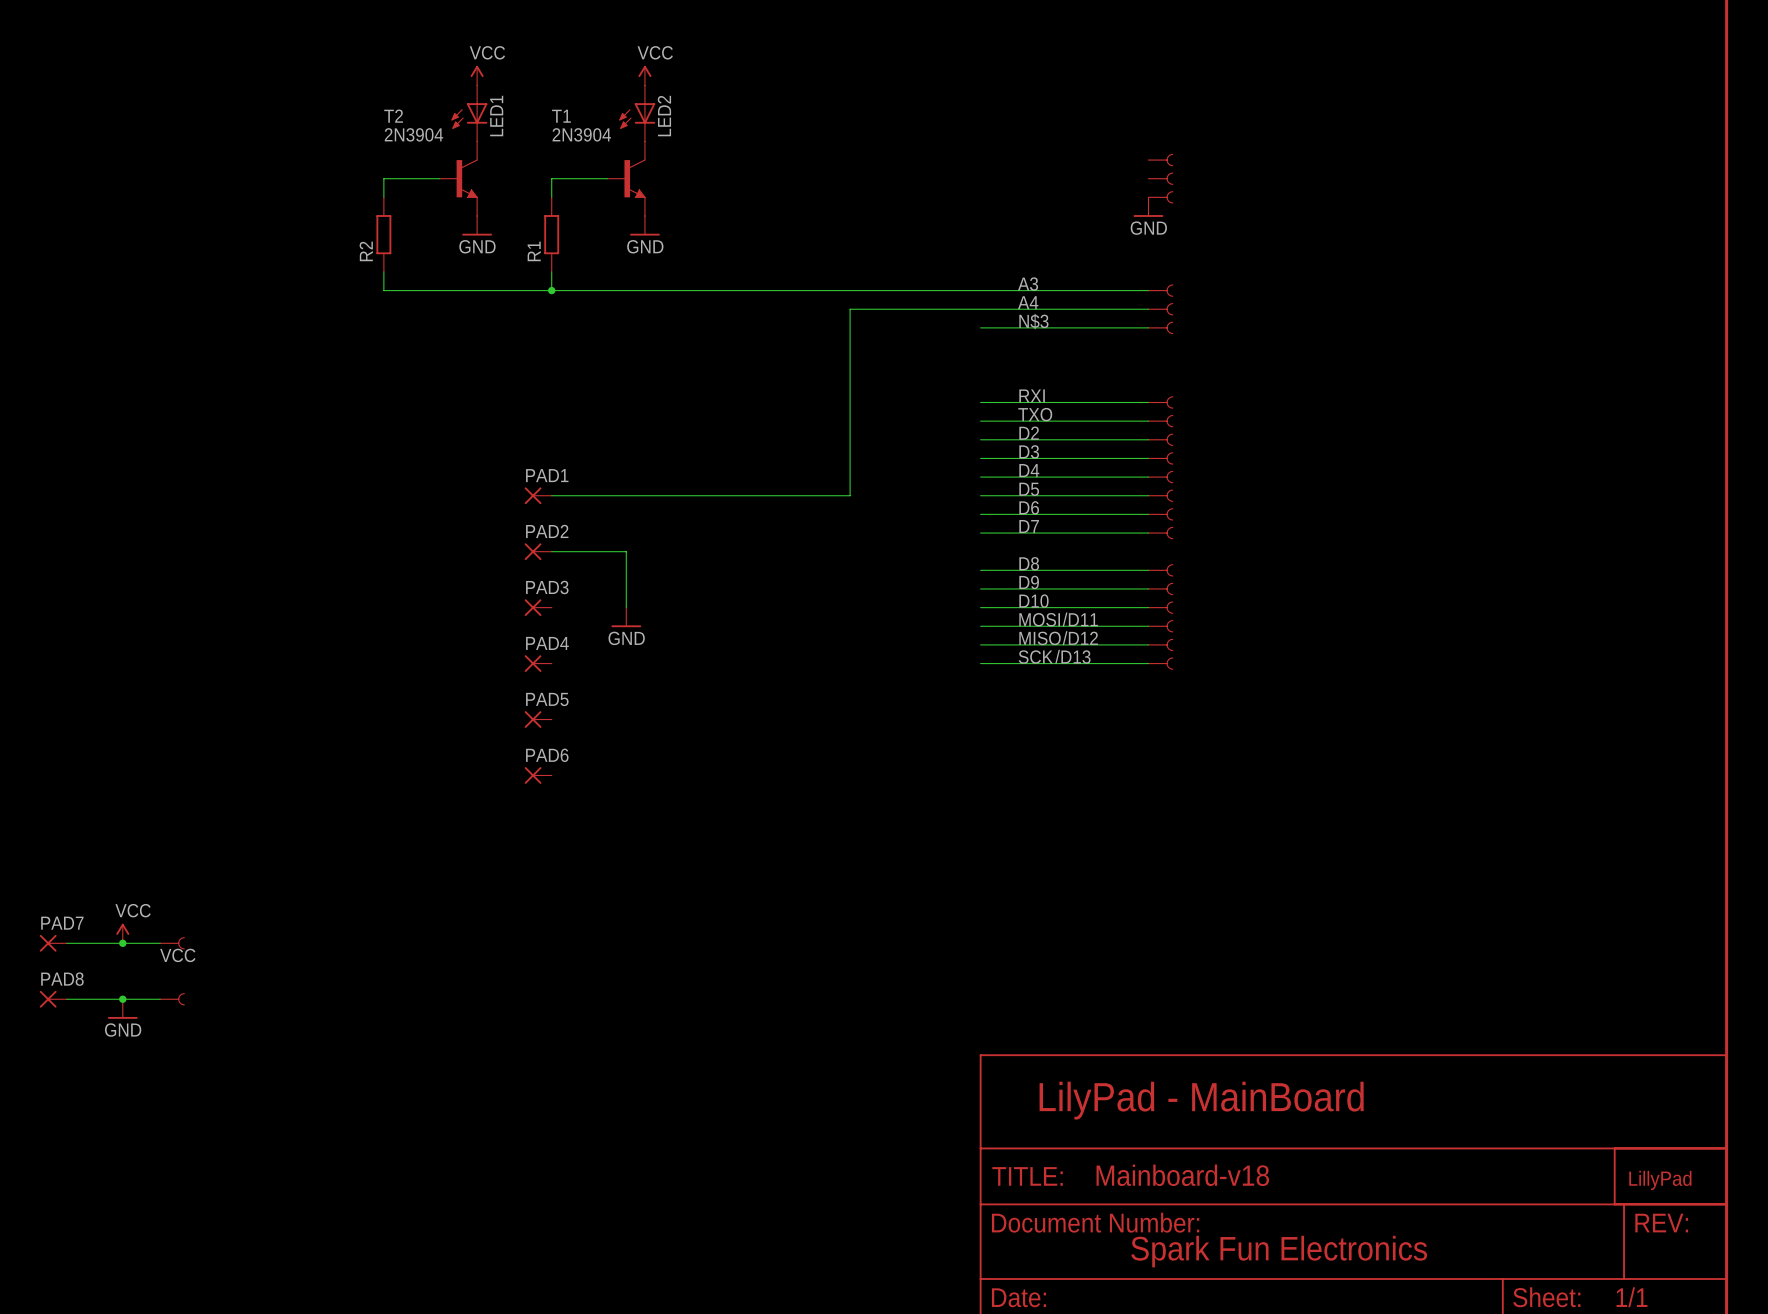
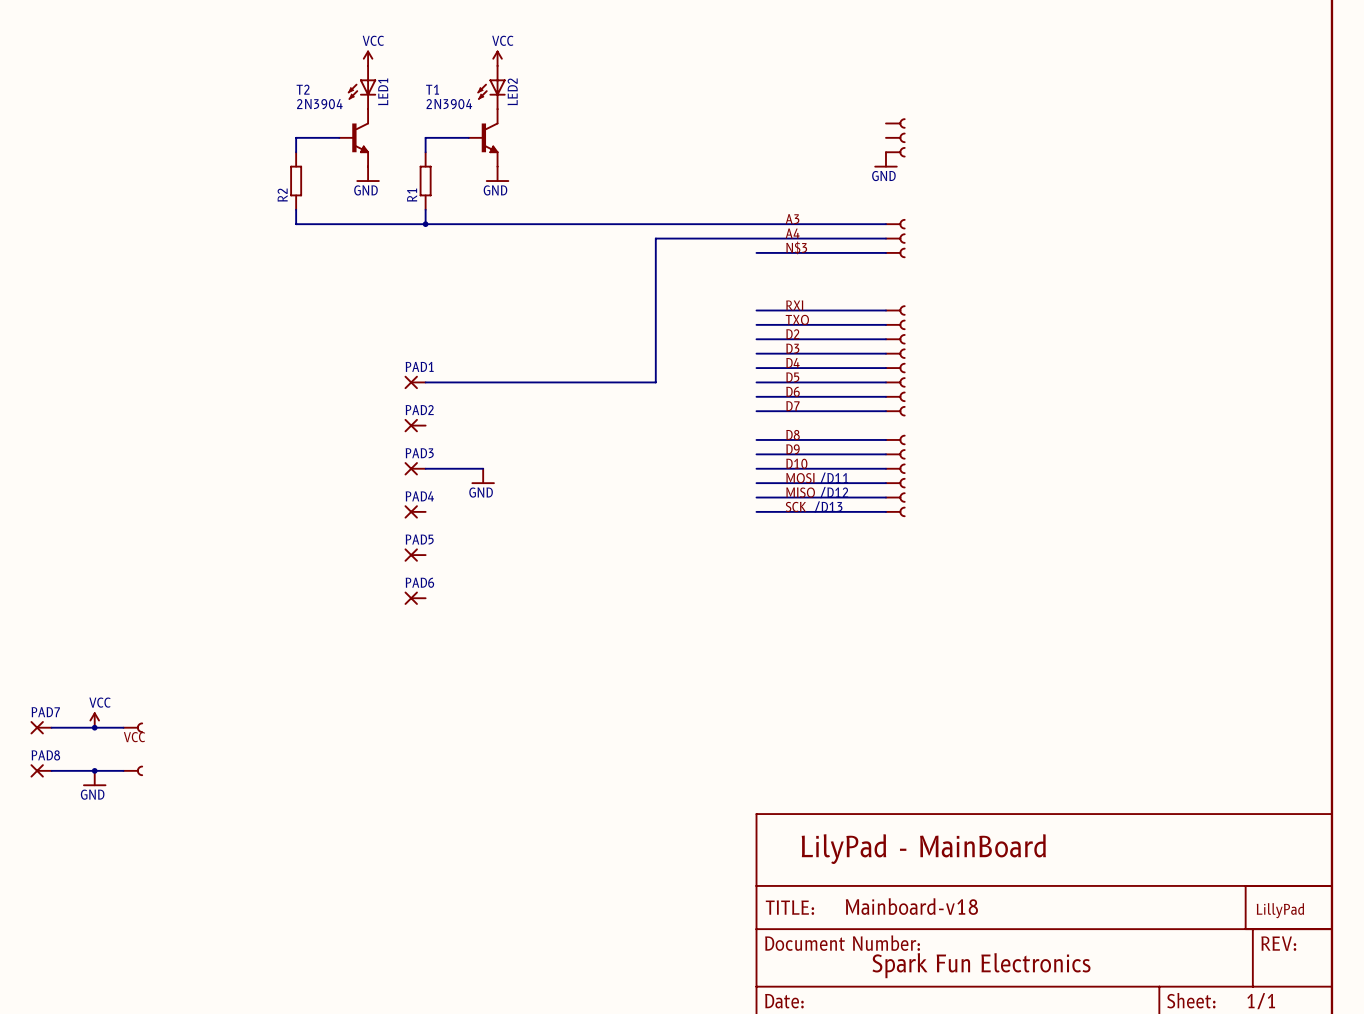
wire: (551, 551) (626, 551) (626, 607) -> (425, 468) (483, 468)

